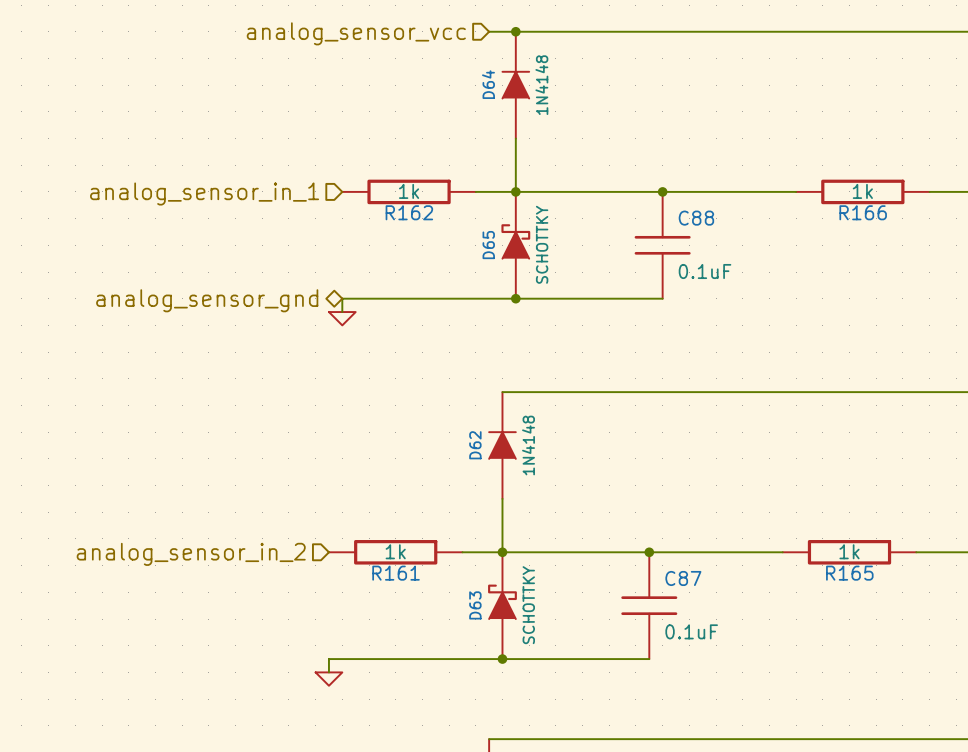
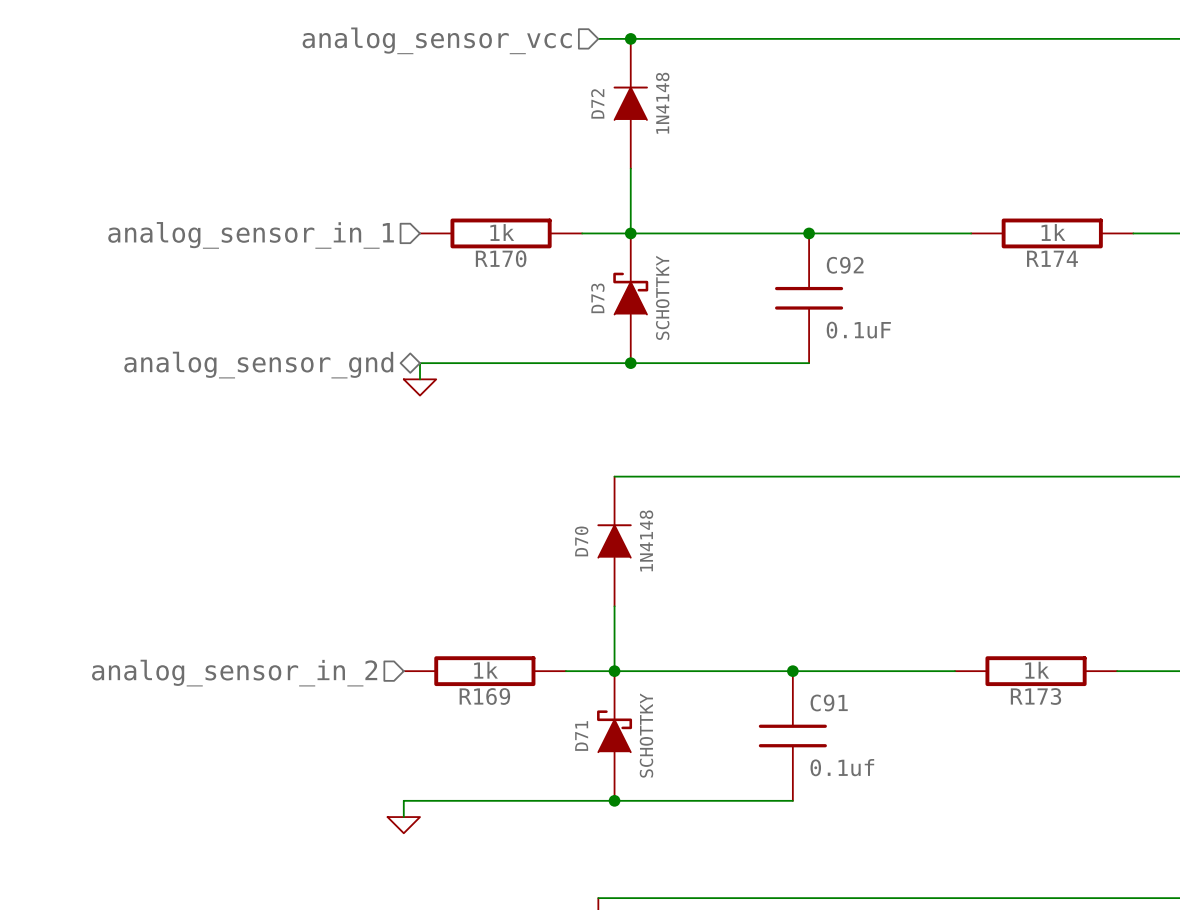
D64 name: D64 (488, 84) -> D72 (597, 103)
R162 name: R162 (409, 212) -> R170 (501, 258)
R166 name: R166 (863, 212) -> R174 (1052, 258)
C88 name: C88 (696, 218) -> C92 (845, 265)
D65 name: D65 (488, 245) -> D73 (597, 298)
D62 name: D62 (475, 445) -> D70 (581, 541)
R161 name: R161 (396, 573) -> R169 (484, 696)
R165 name: R165 (849, 573) -> R173 (1035, 696)
C87 name: C87 (683, 578) -> C91 (829, 702)
D63 name: D63 (475, 605) -> D71 (581, 736)
C87 value: 0.1uF (691, 631) -> 0.1uf (842, 767)

